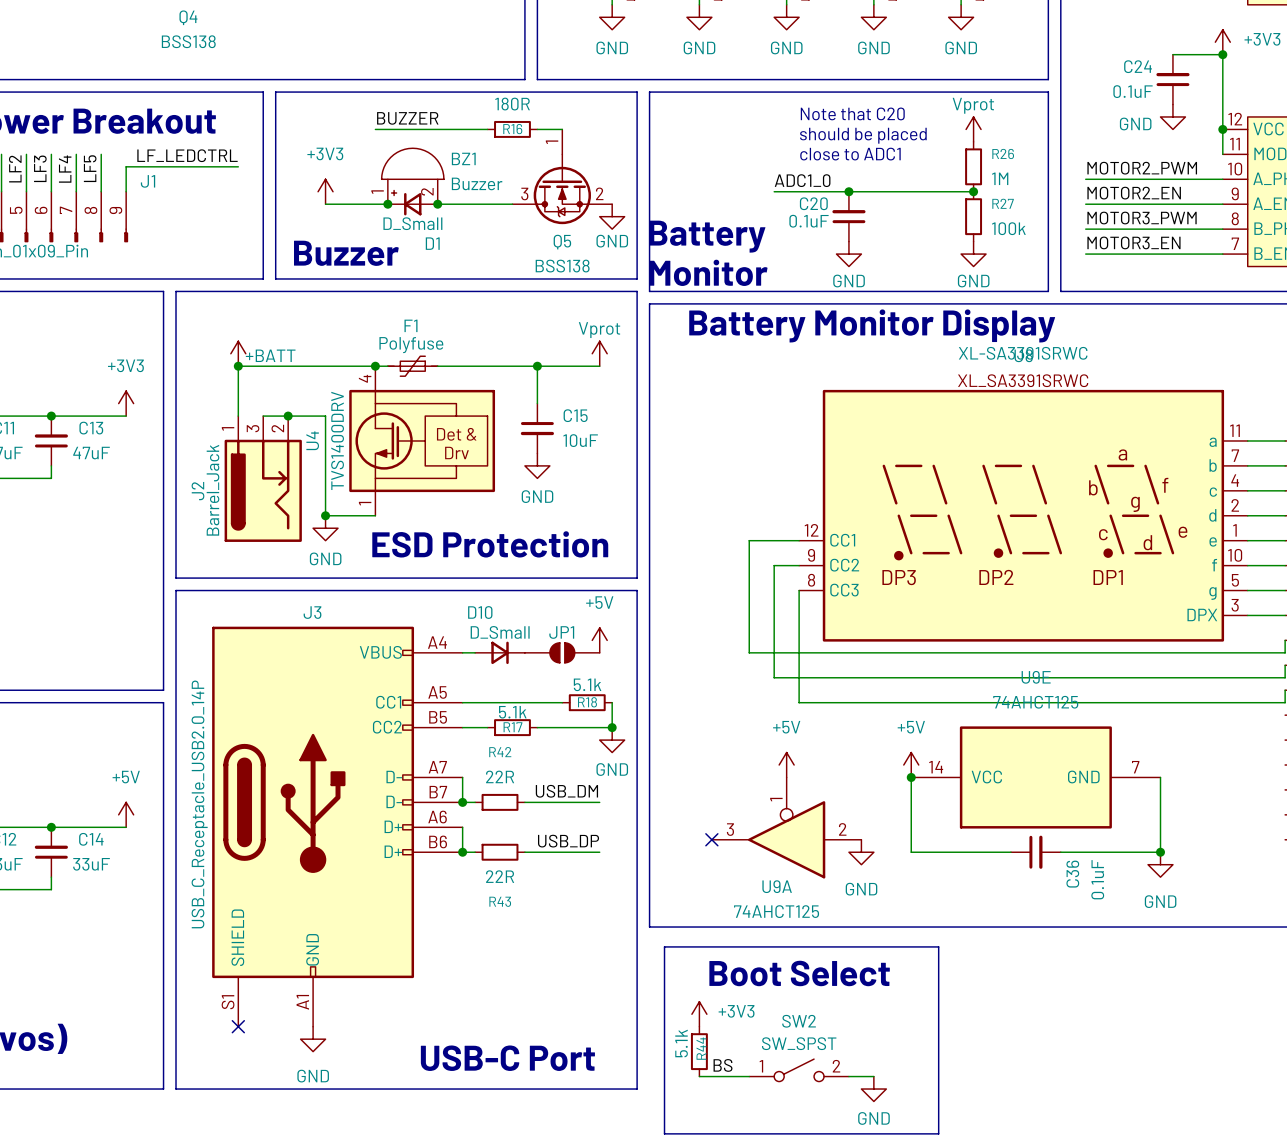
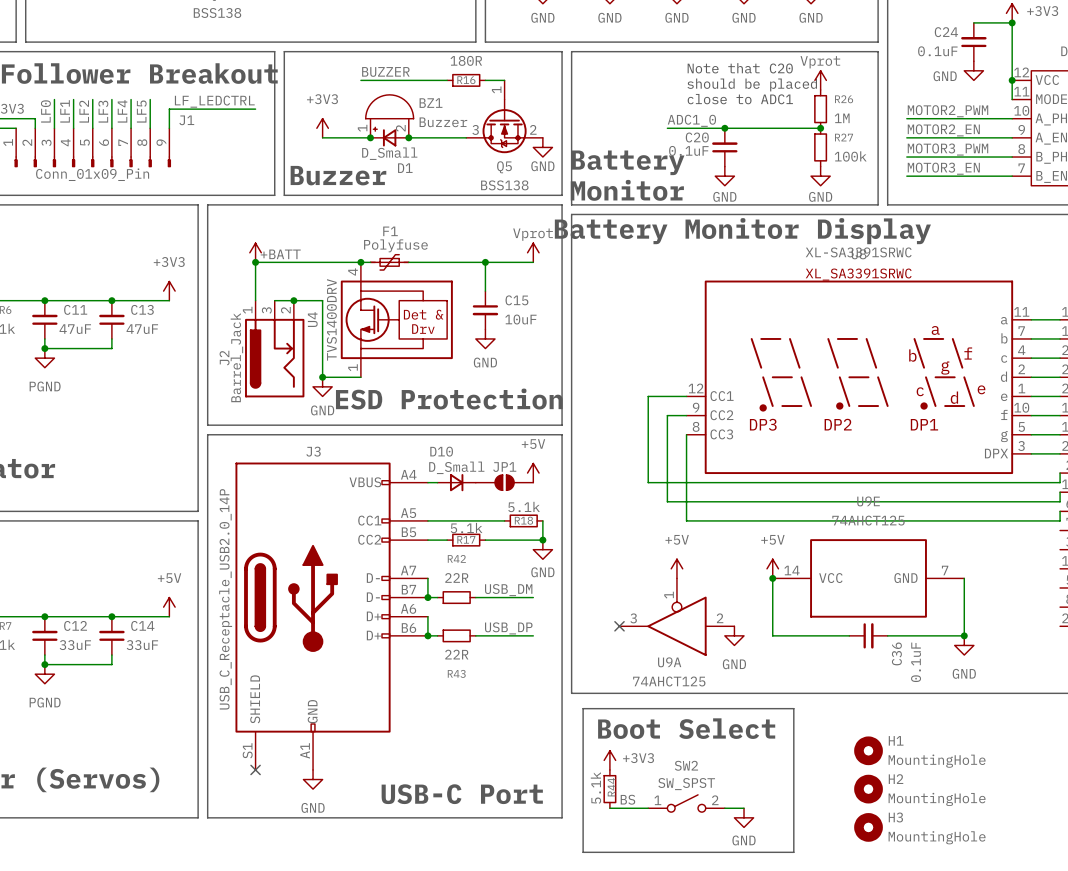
H1: none -> MountingHole (868, 750)
H2: none -> MountingHole (868, 789)
H3: none -> MountingHole (868, 827)

